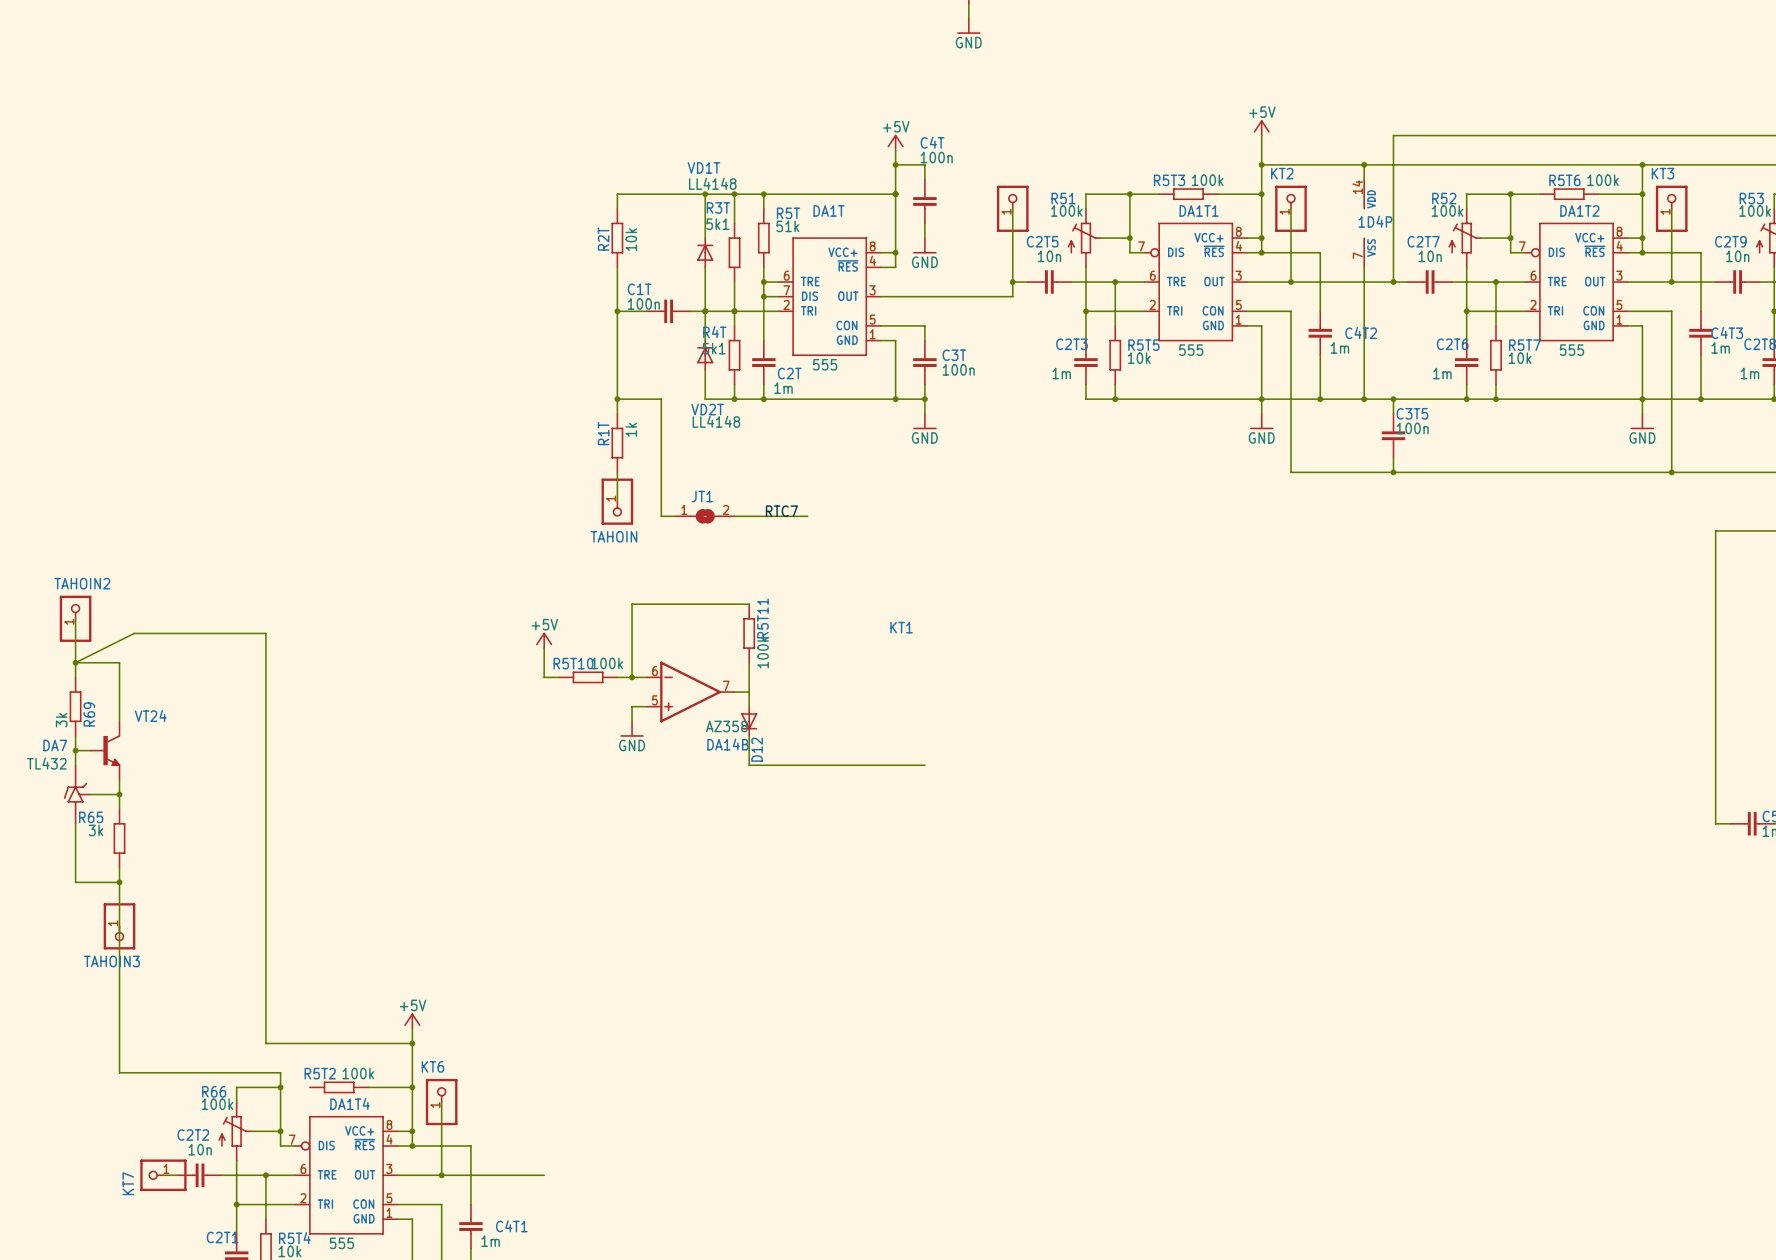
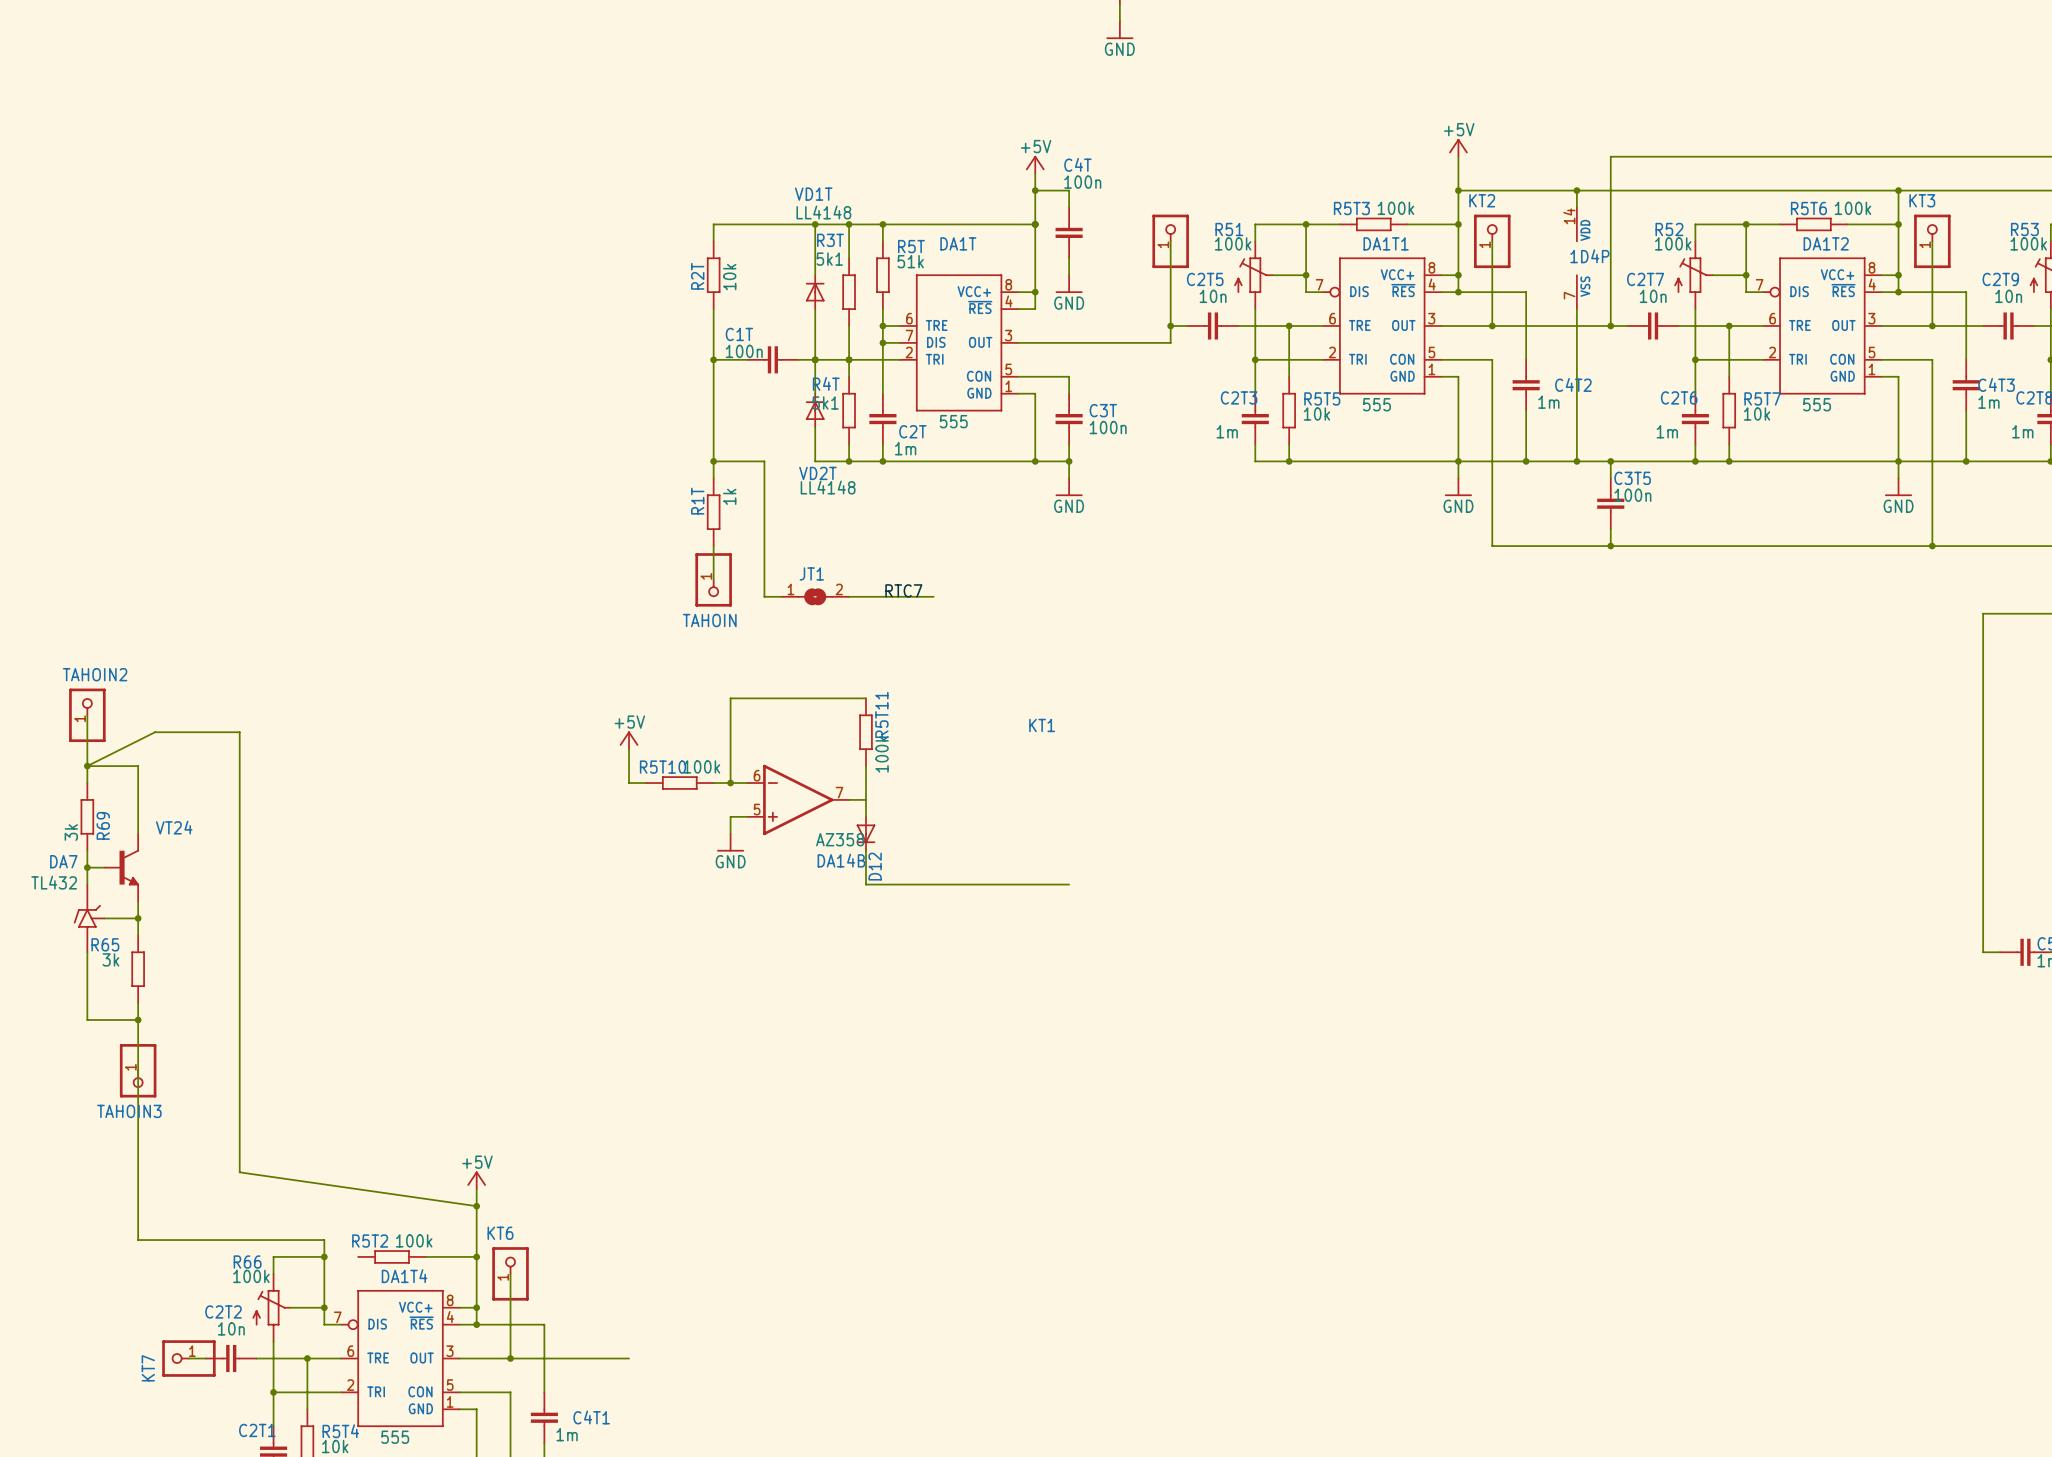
wire: (207, 633) (265, 633) (265, 1043) (412, 1043) -> (239, 732) (239, 1172) (476, 1206)

